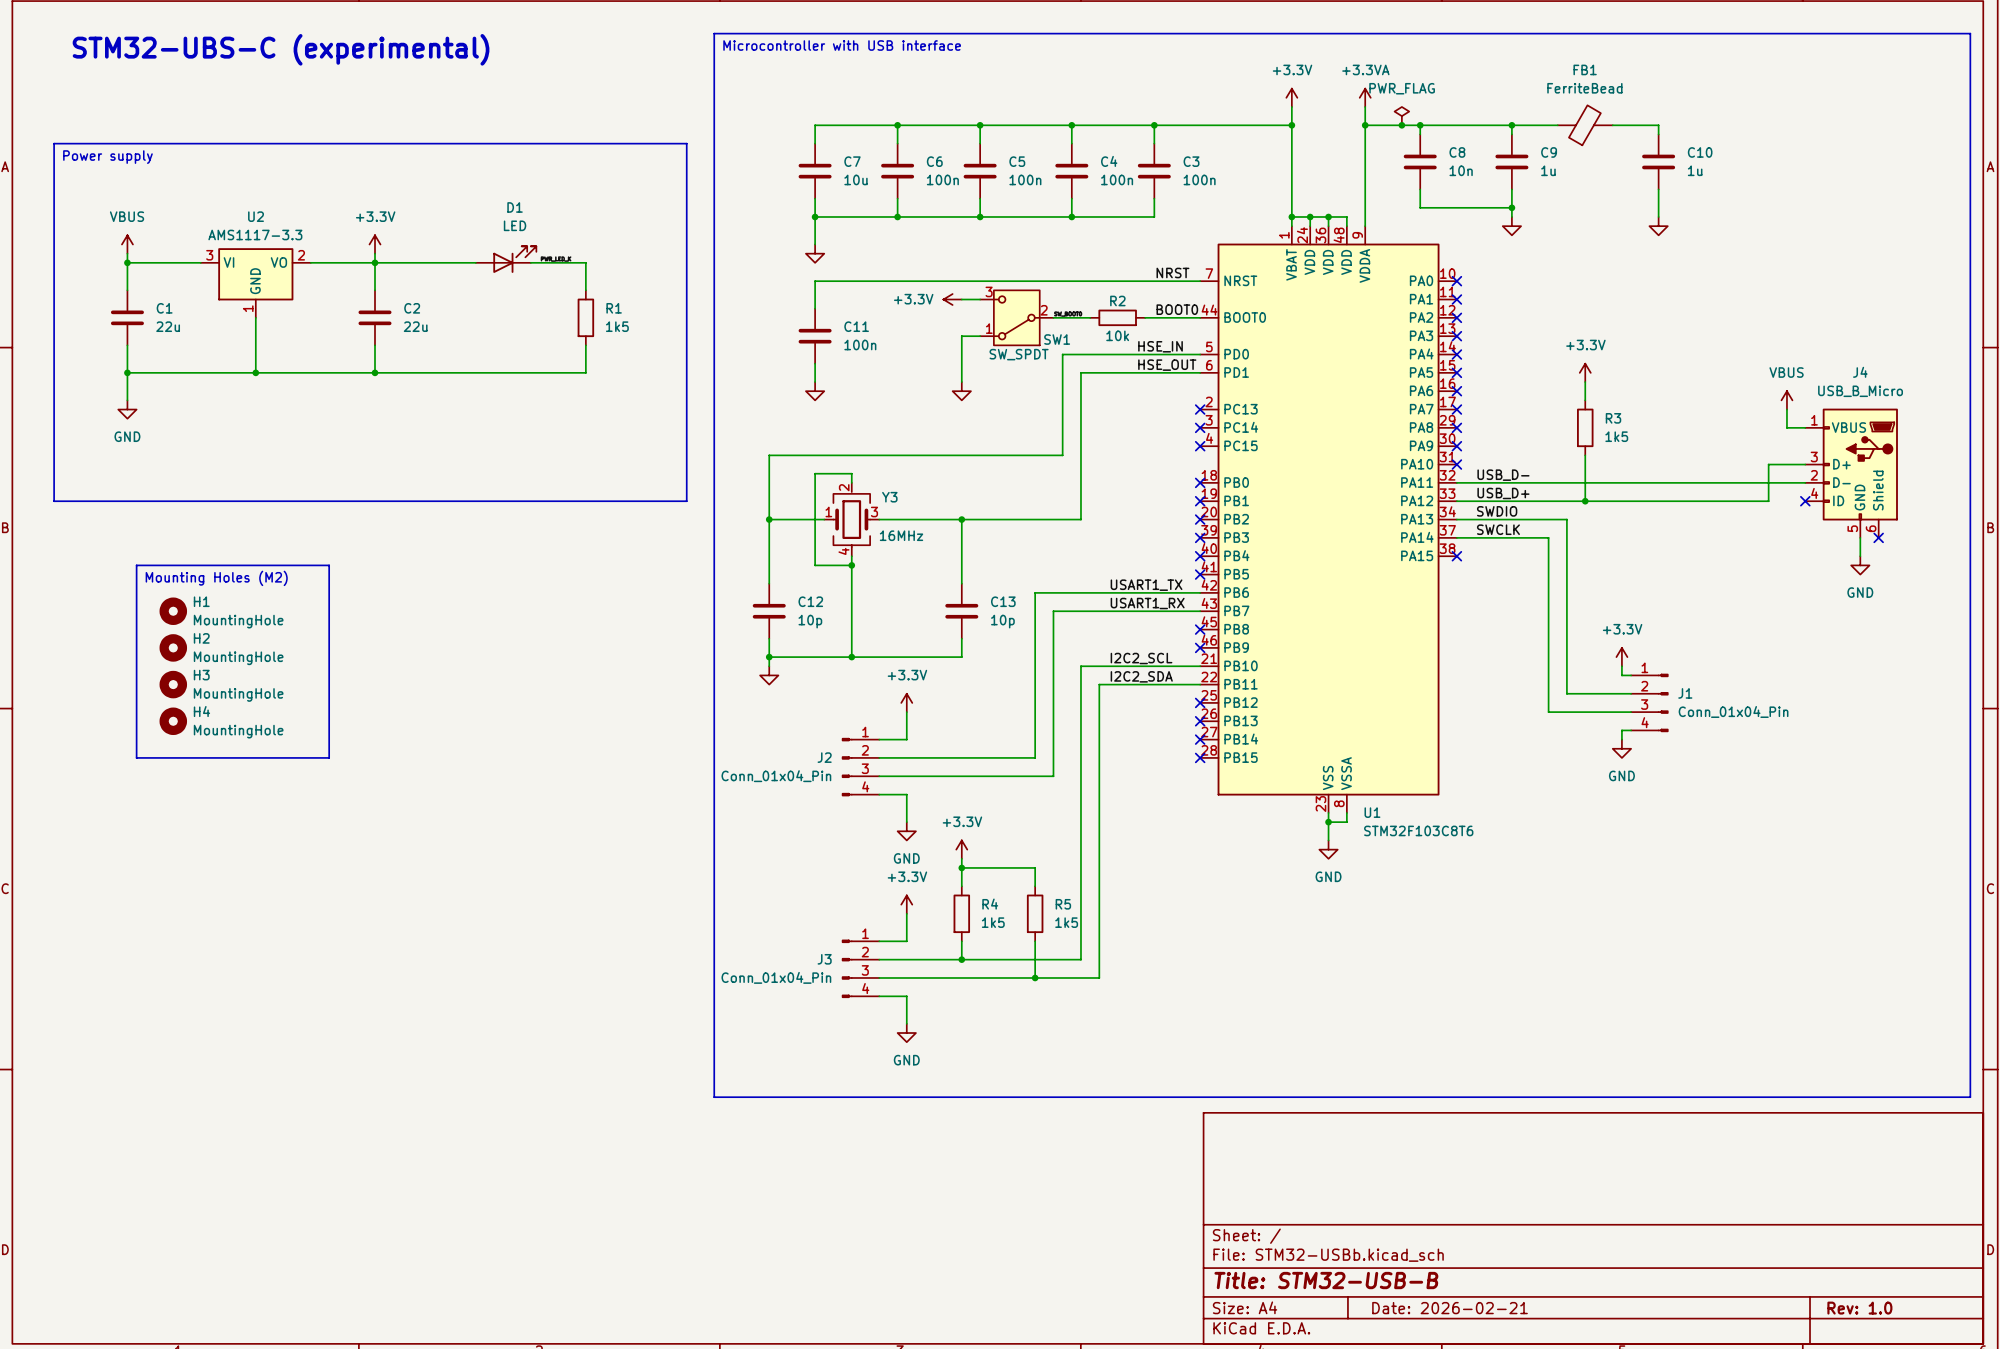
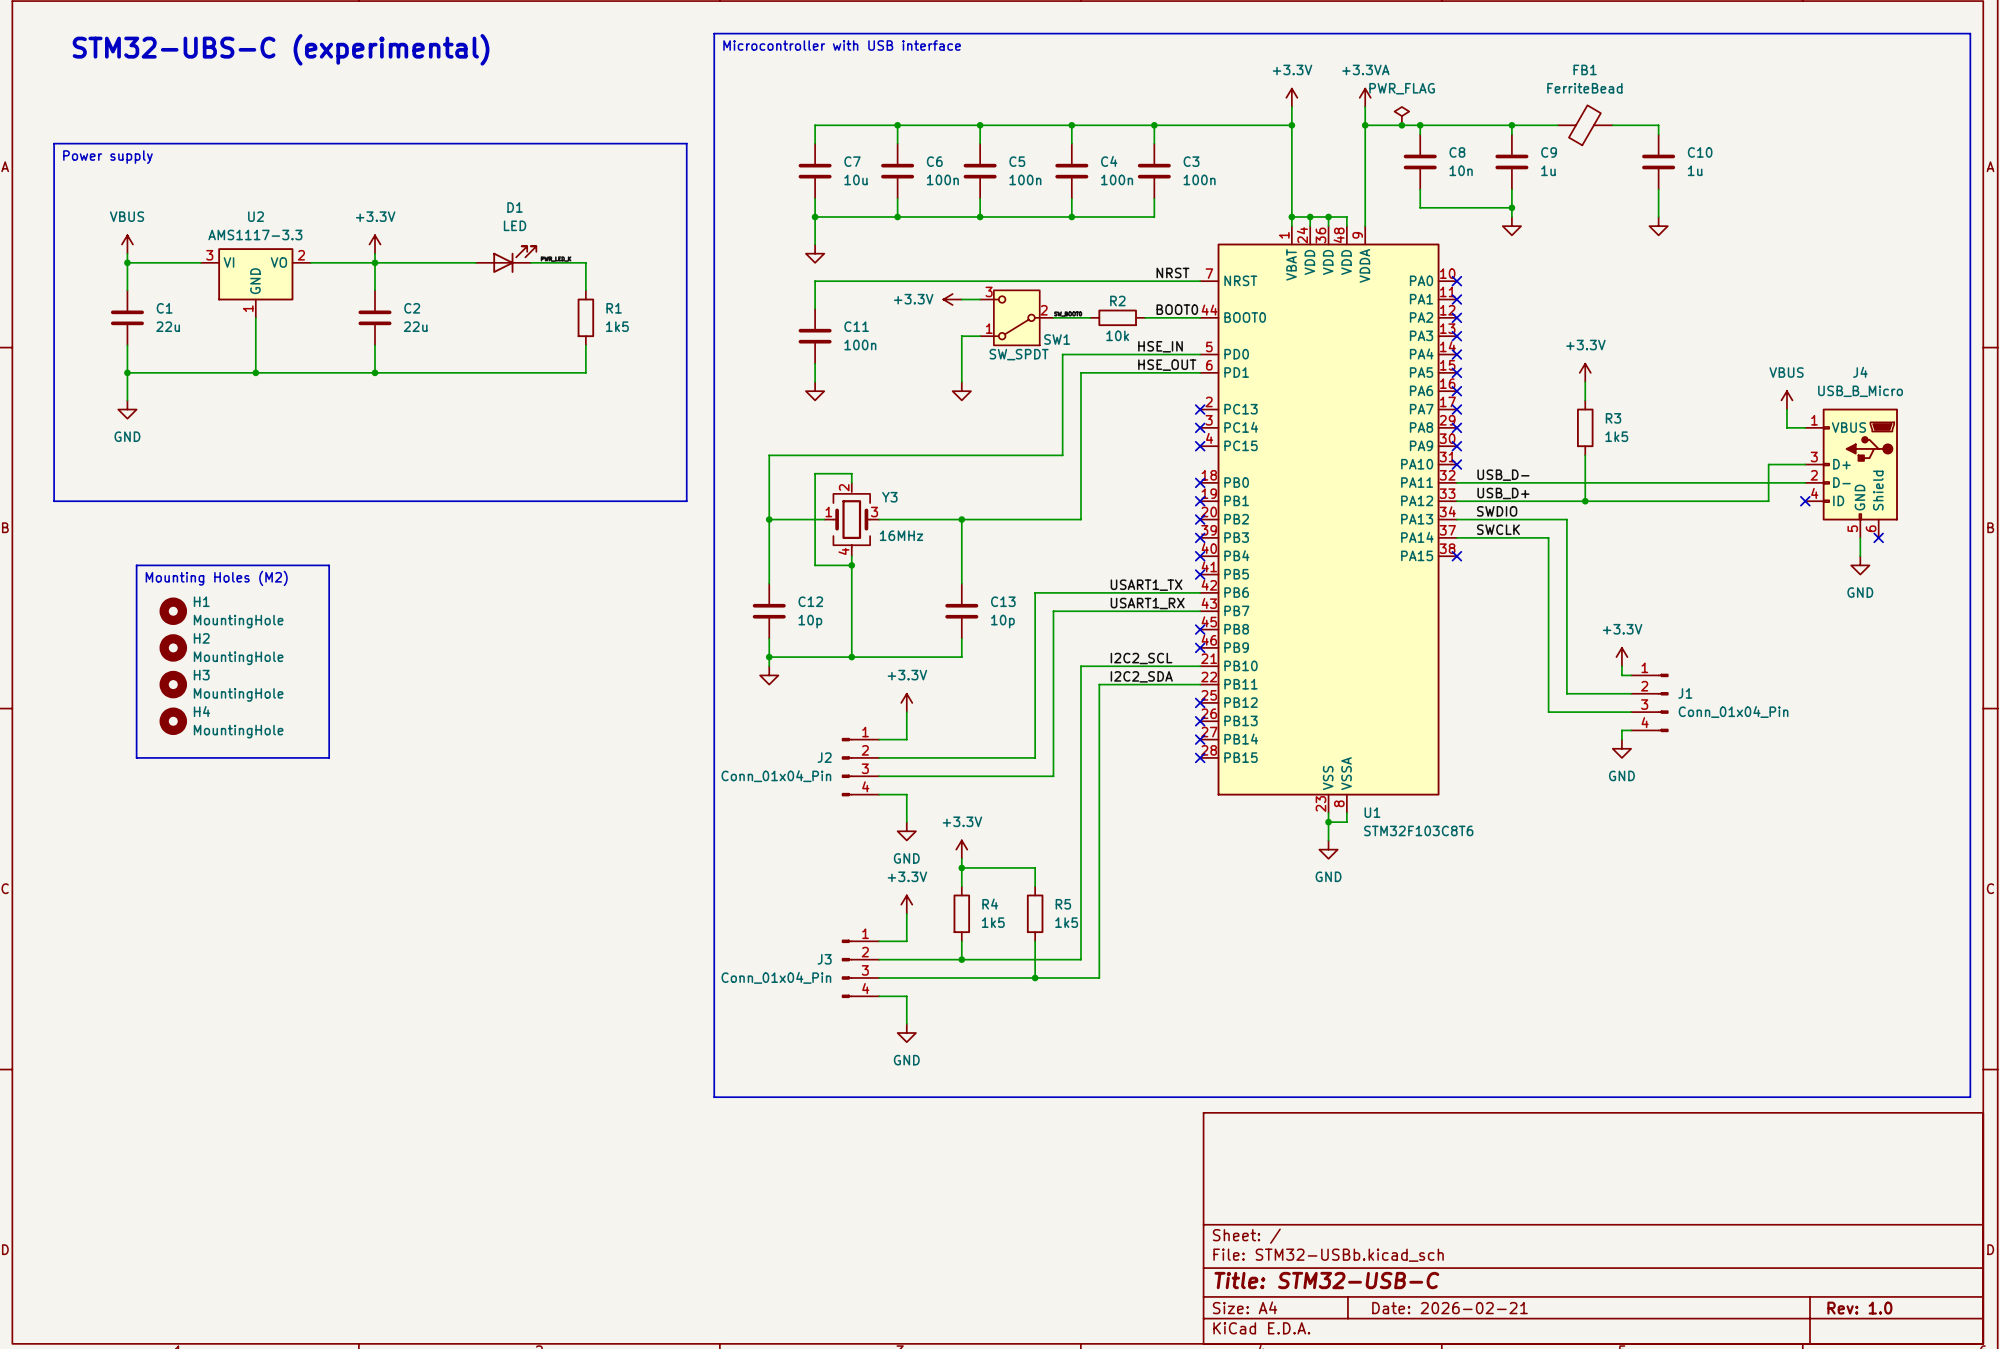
title block: Title: STM32-USB-B (1326, 1280) -> Title: STM32-USB-C (1326, 1280)

